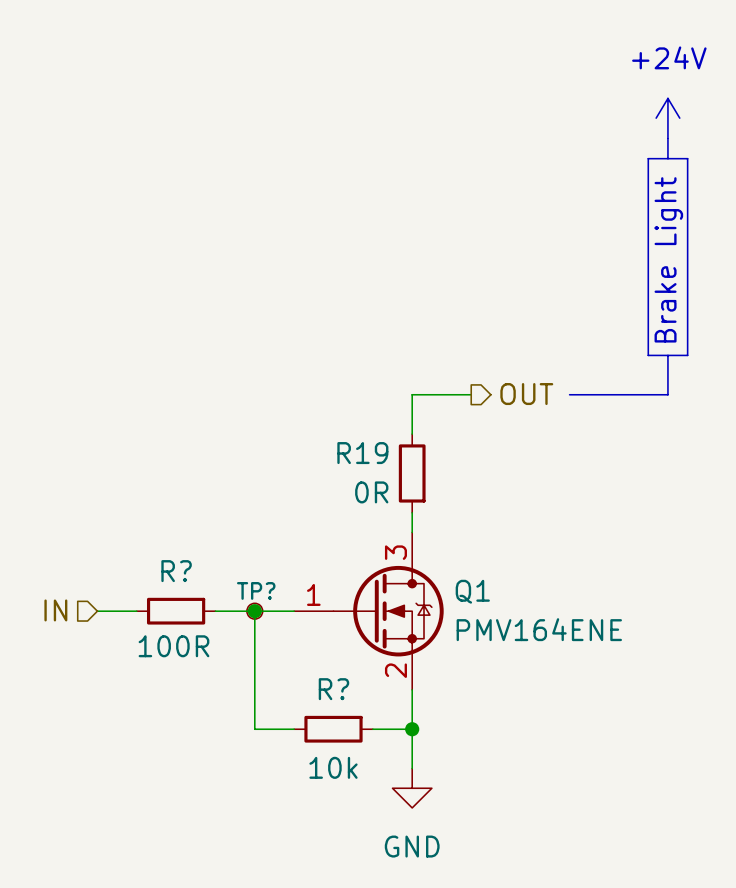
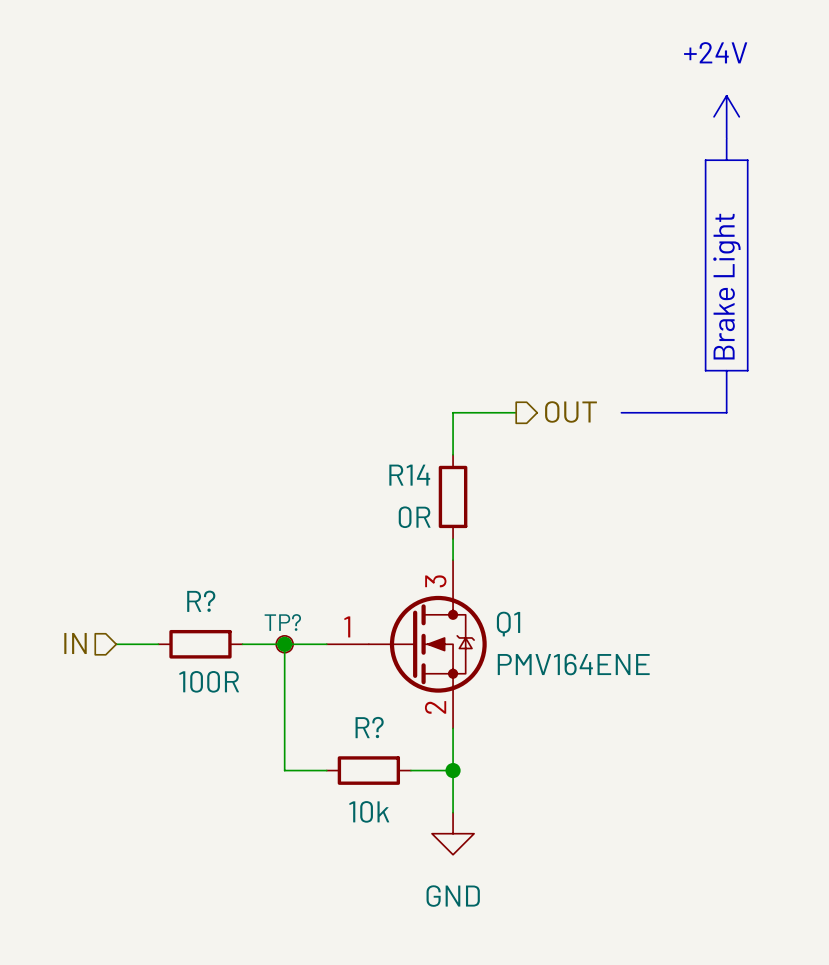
R19 name: R19 (362, 453) -> R14 (409, 475)

